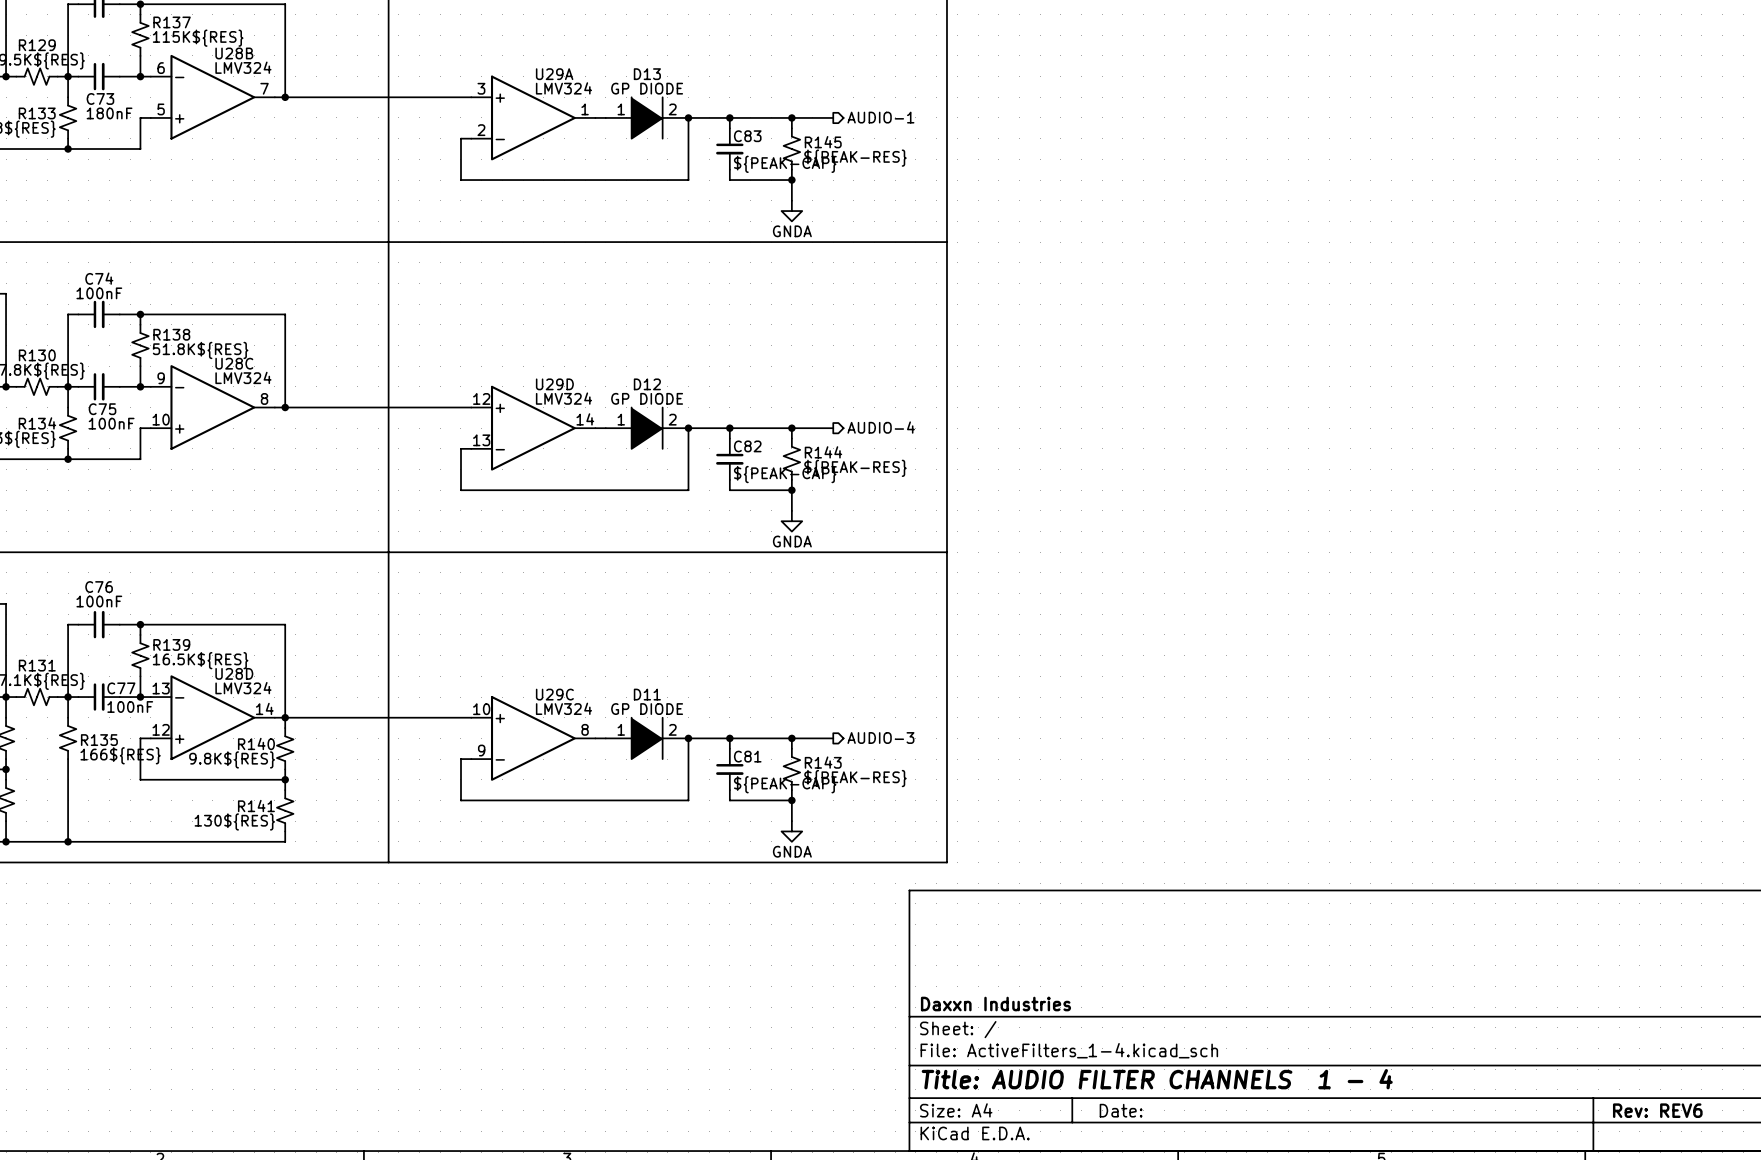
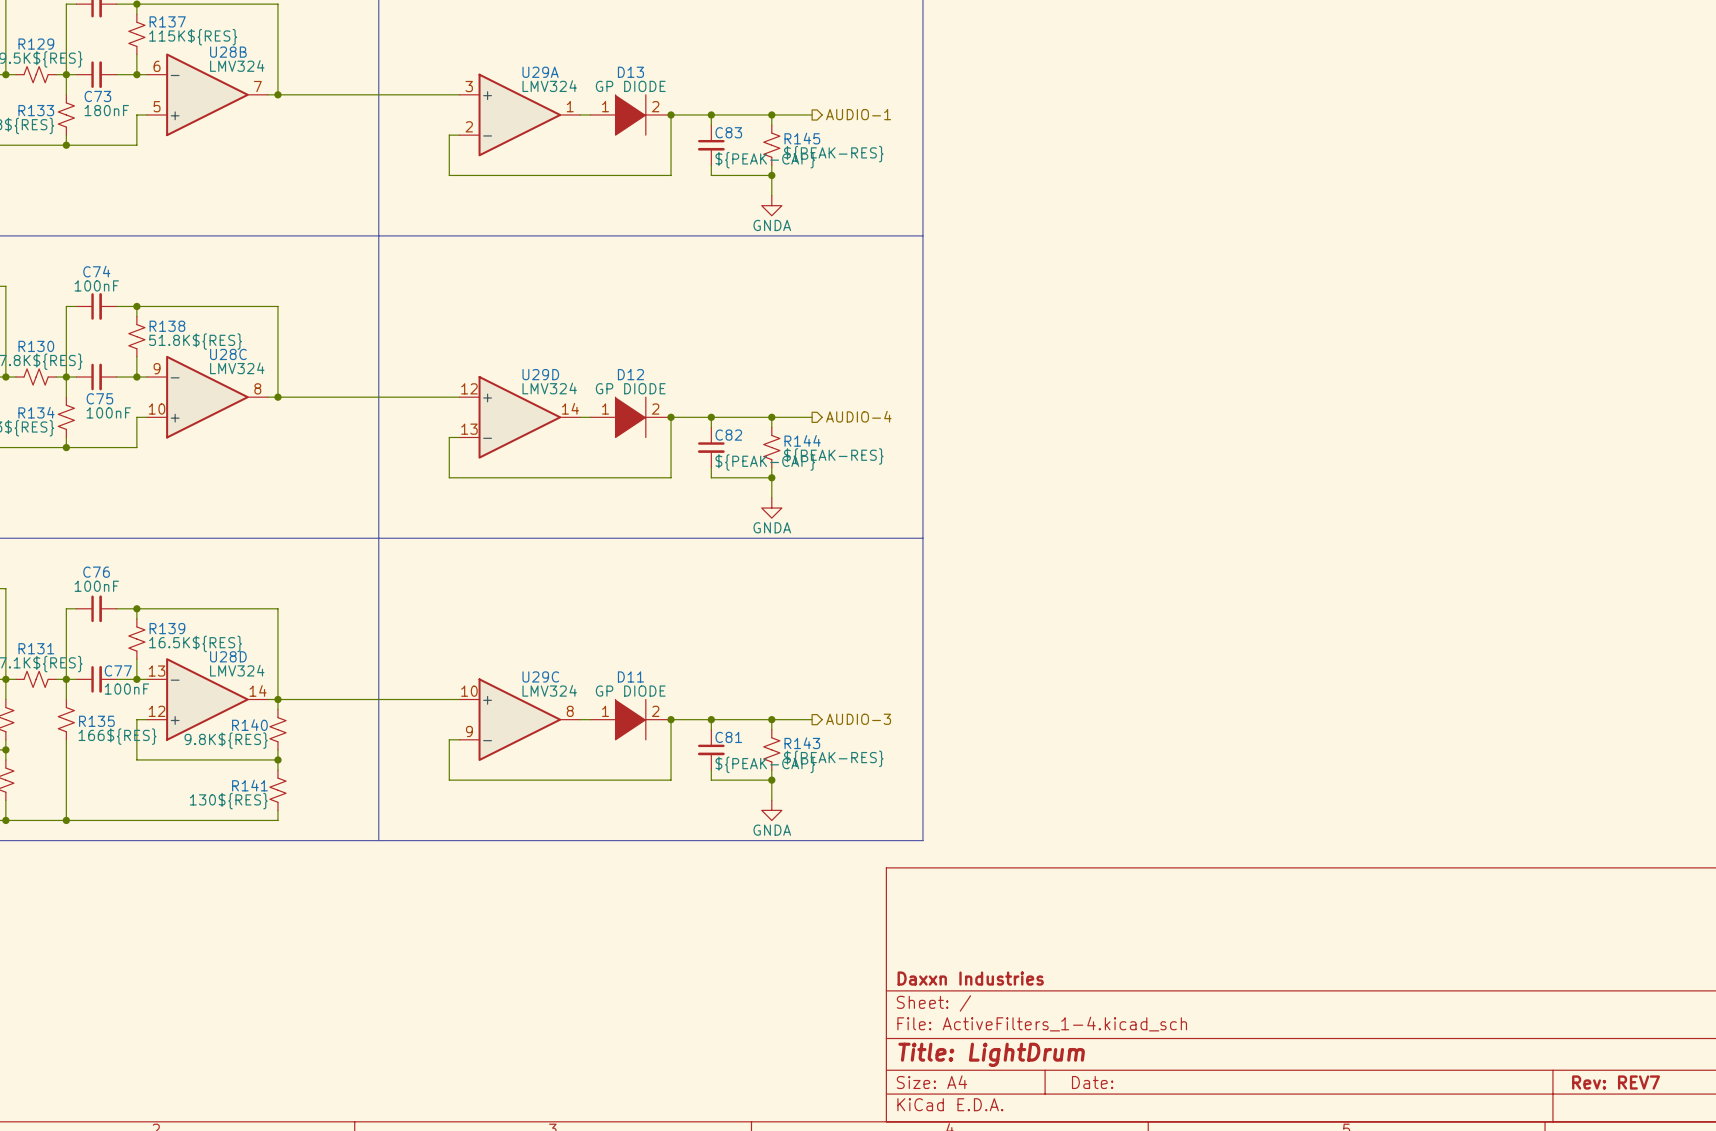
title block: Title: AUDIO FILTER CHANNELS 1 - 4 (1157, 1079) -> Title: LightDrum (991, 1054)
title block: Rev: REV6 (1657, 1110) -> Rev: REV7 (1616, 1082)

